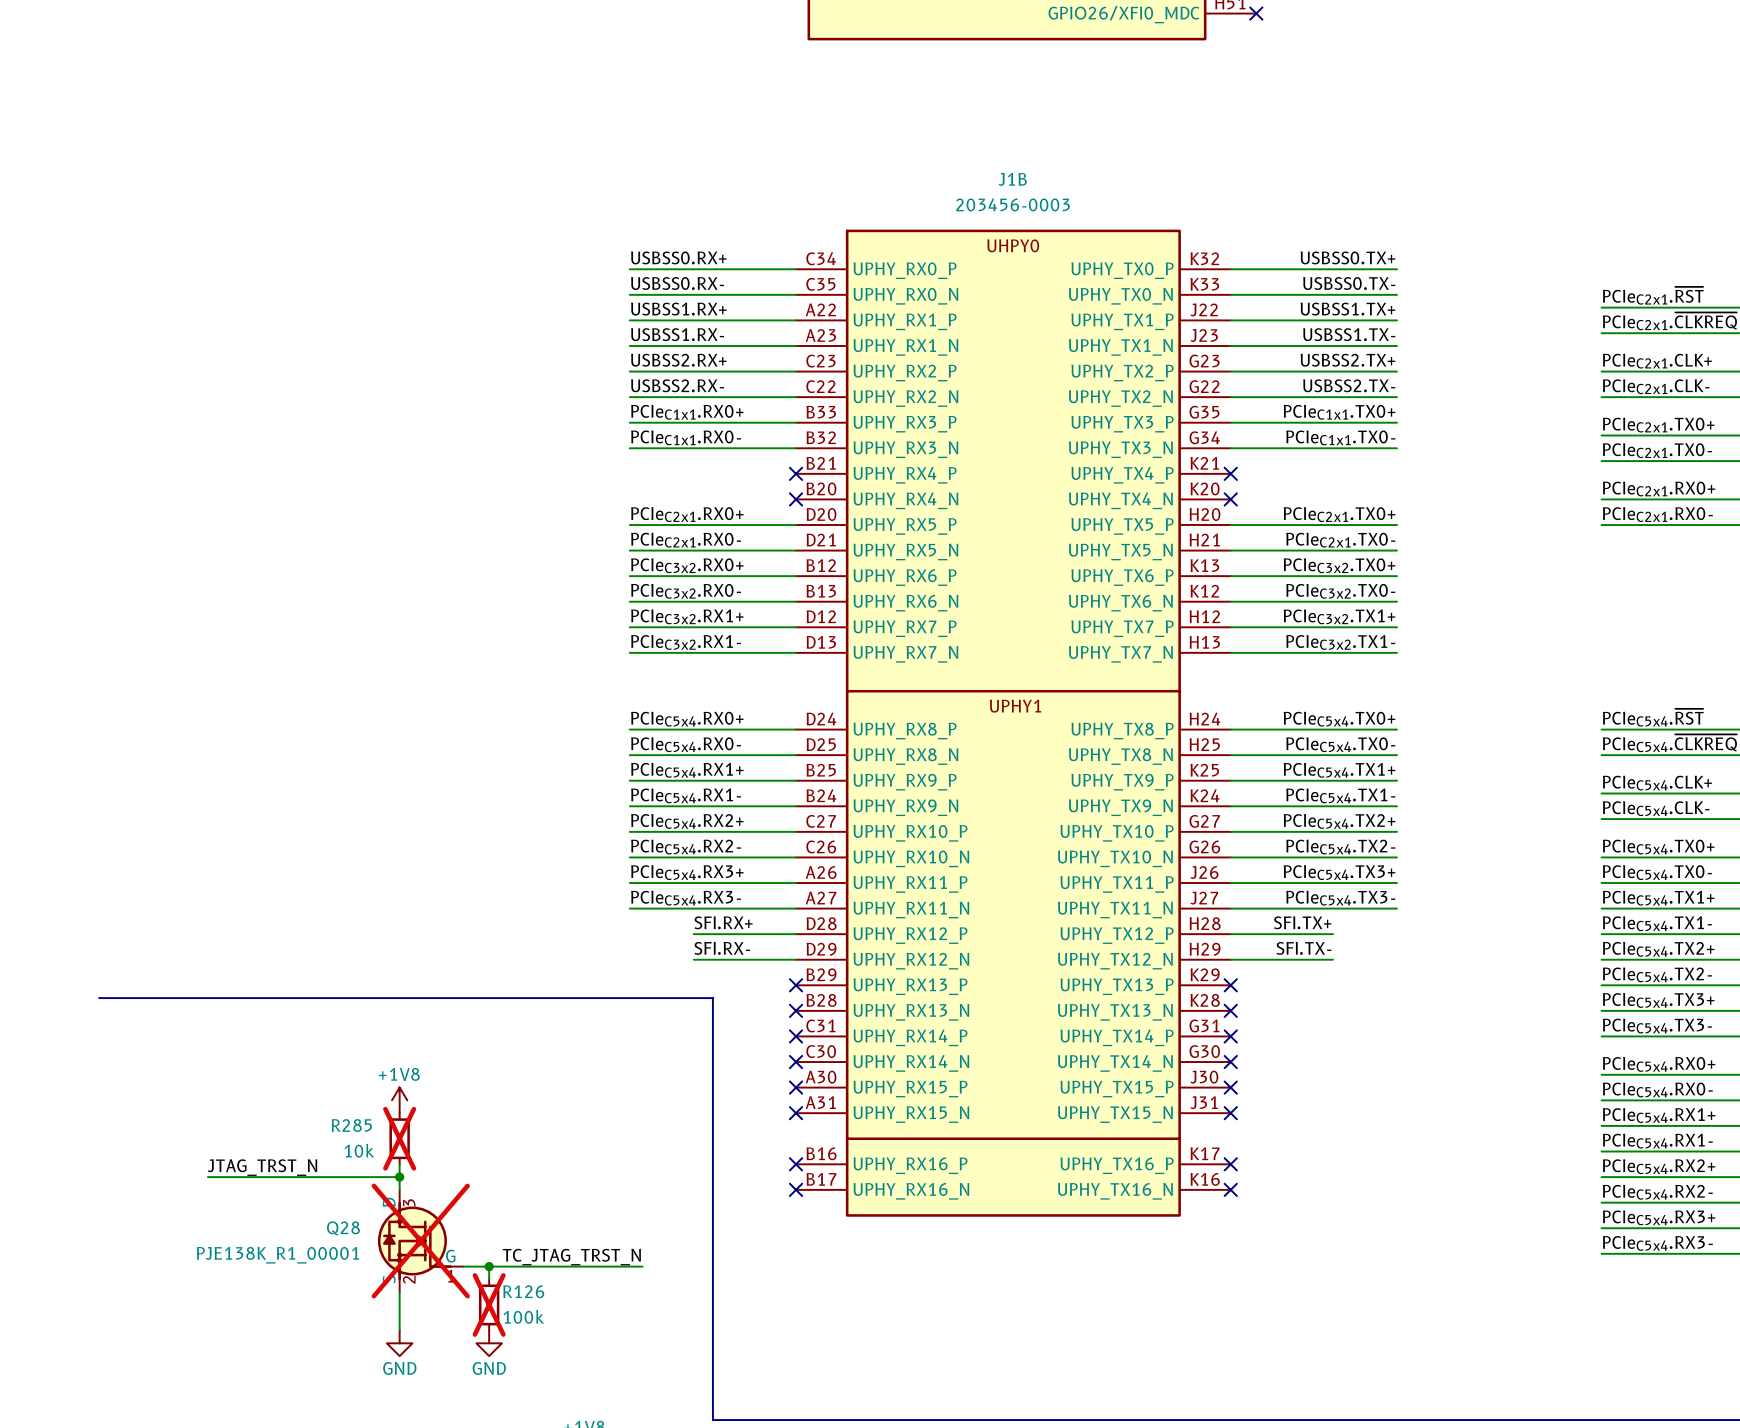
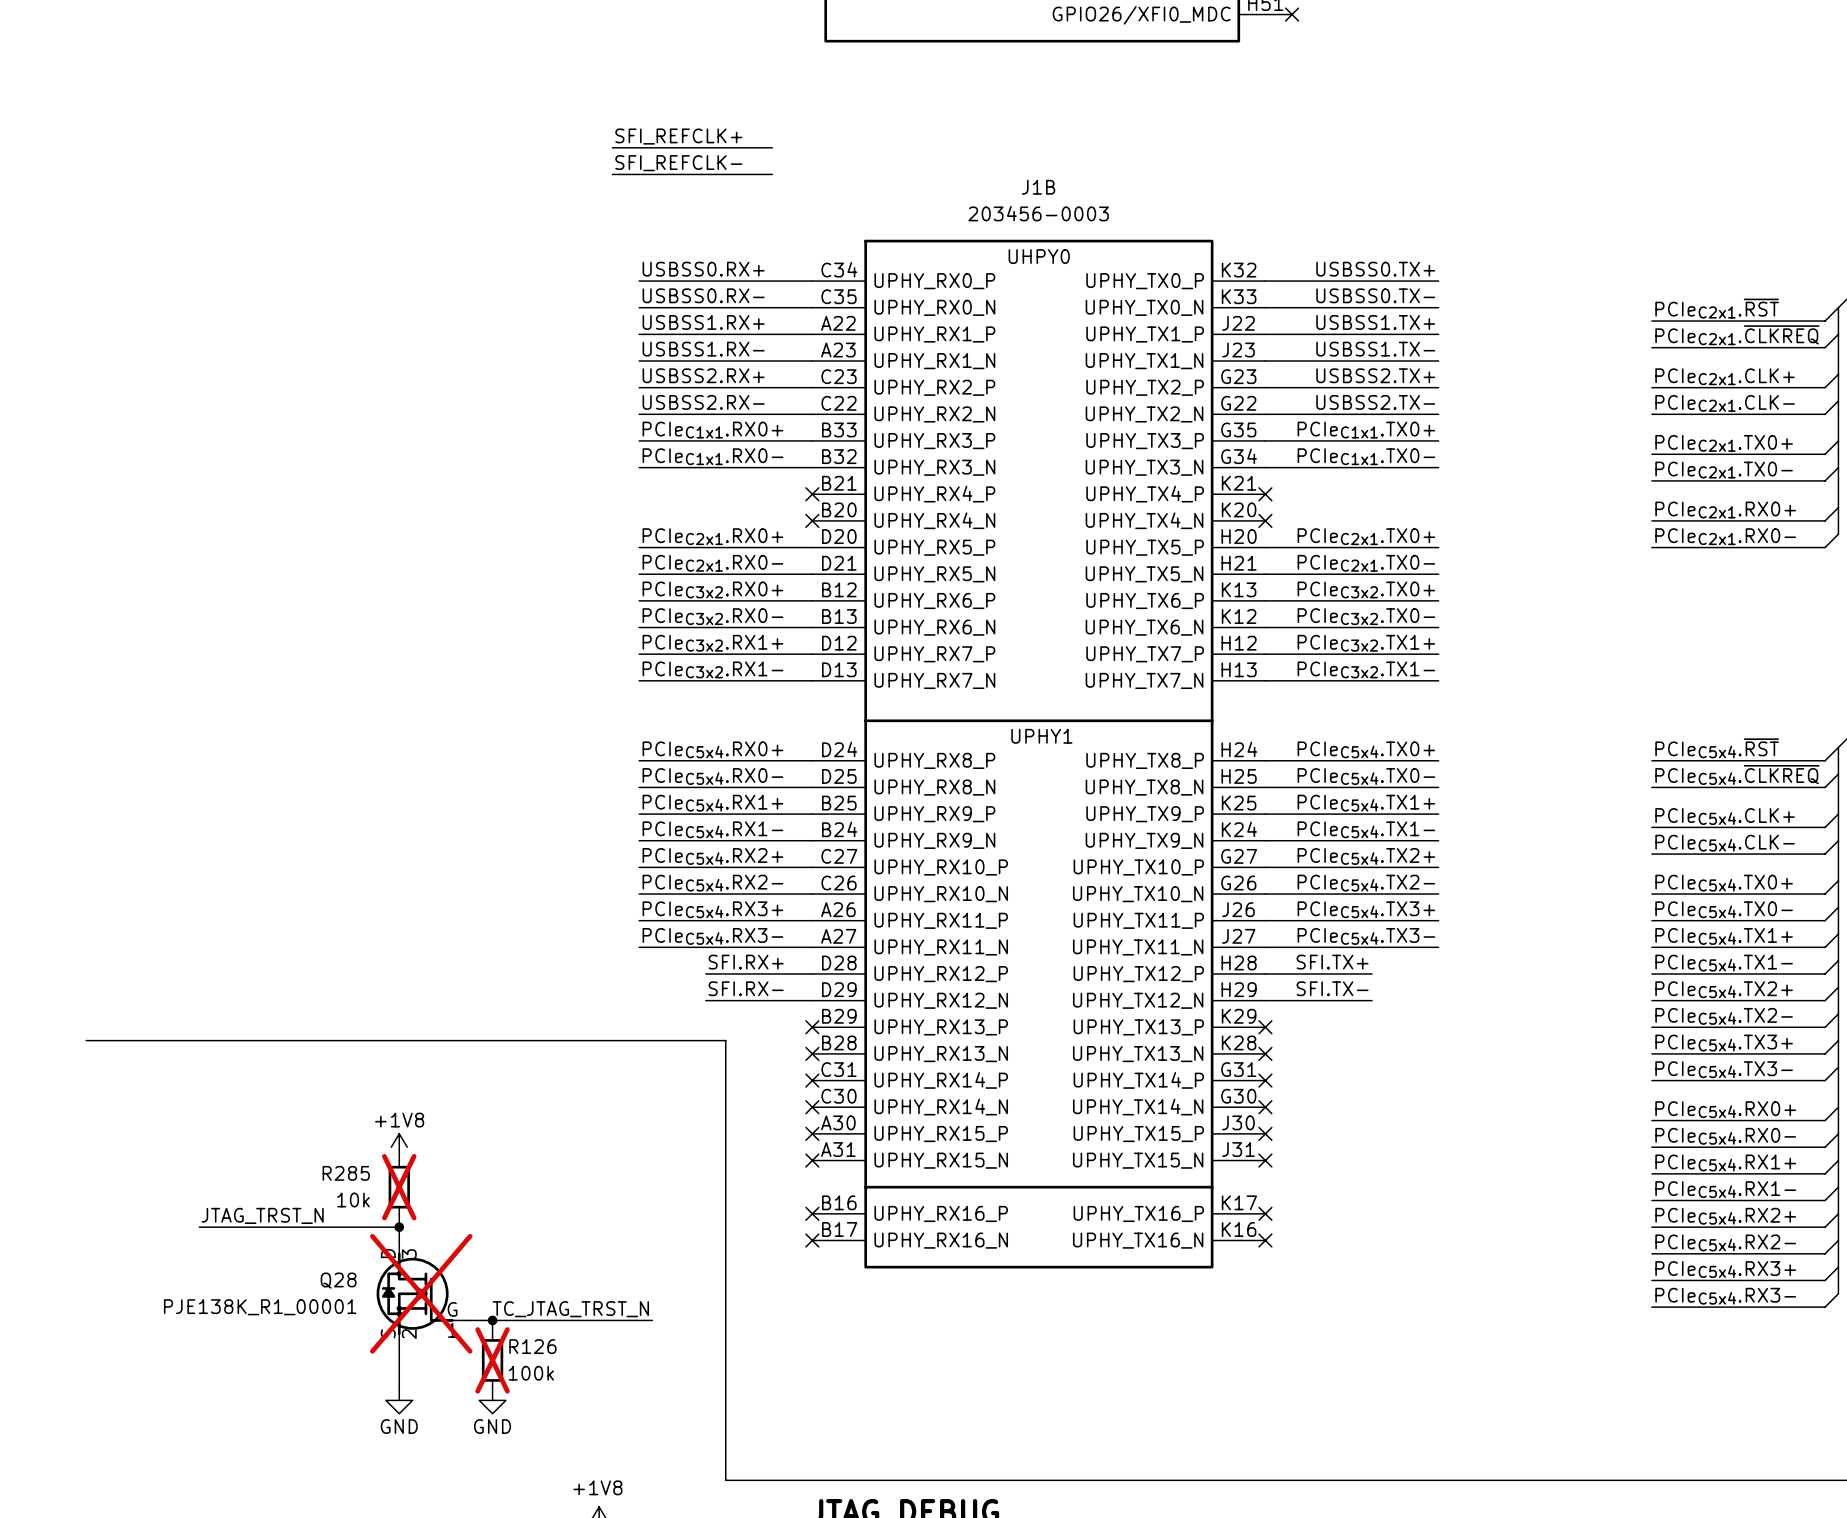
label: none -> SFI_REFCLK+ (678, 136)
wire: none -> (612, 147) (772, 147)
label: none -> SFI_REFCLK- (678, 163)
wire: none -> (612, 174) (772, 174)

